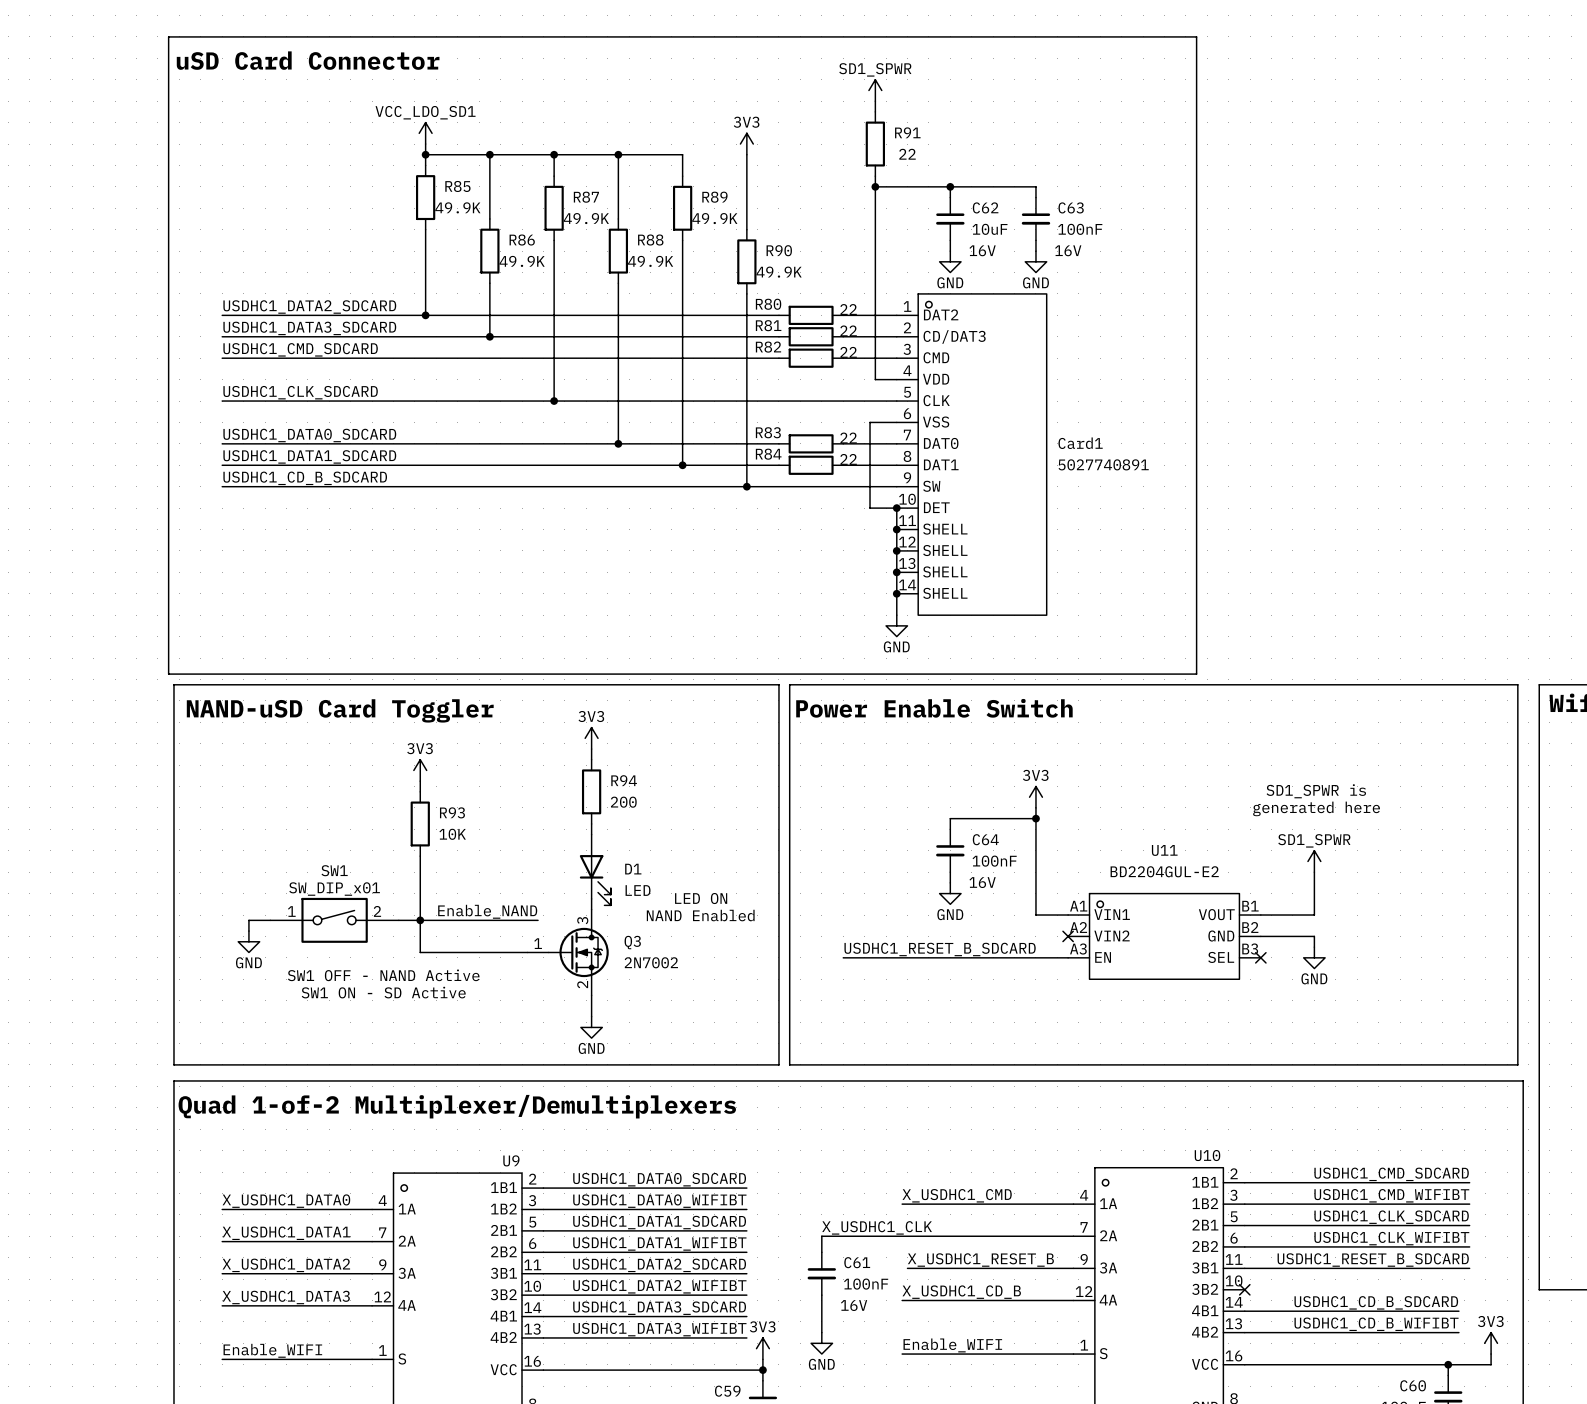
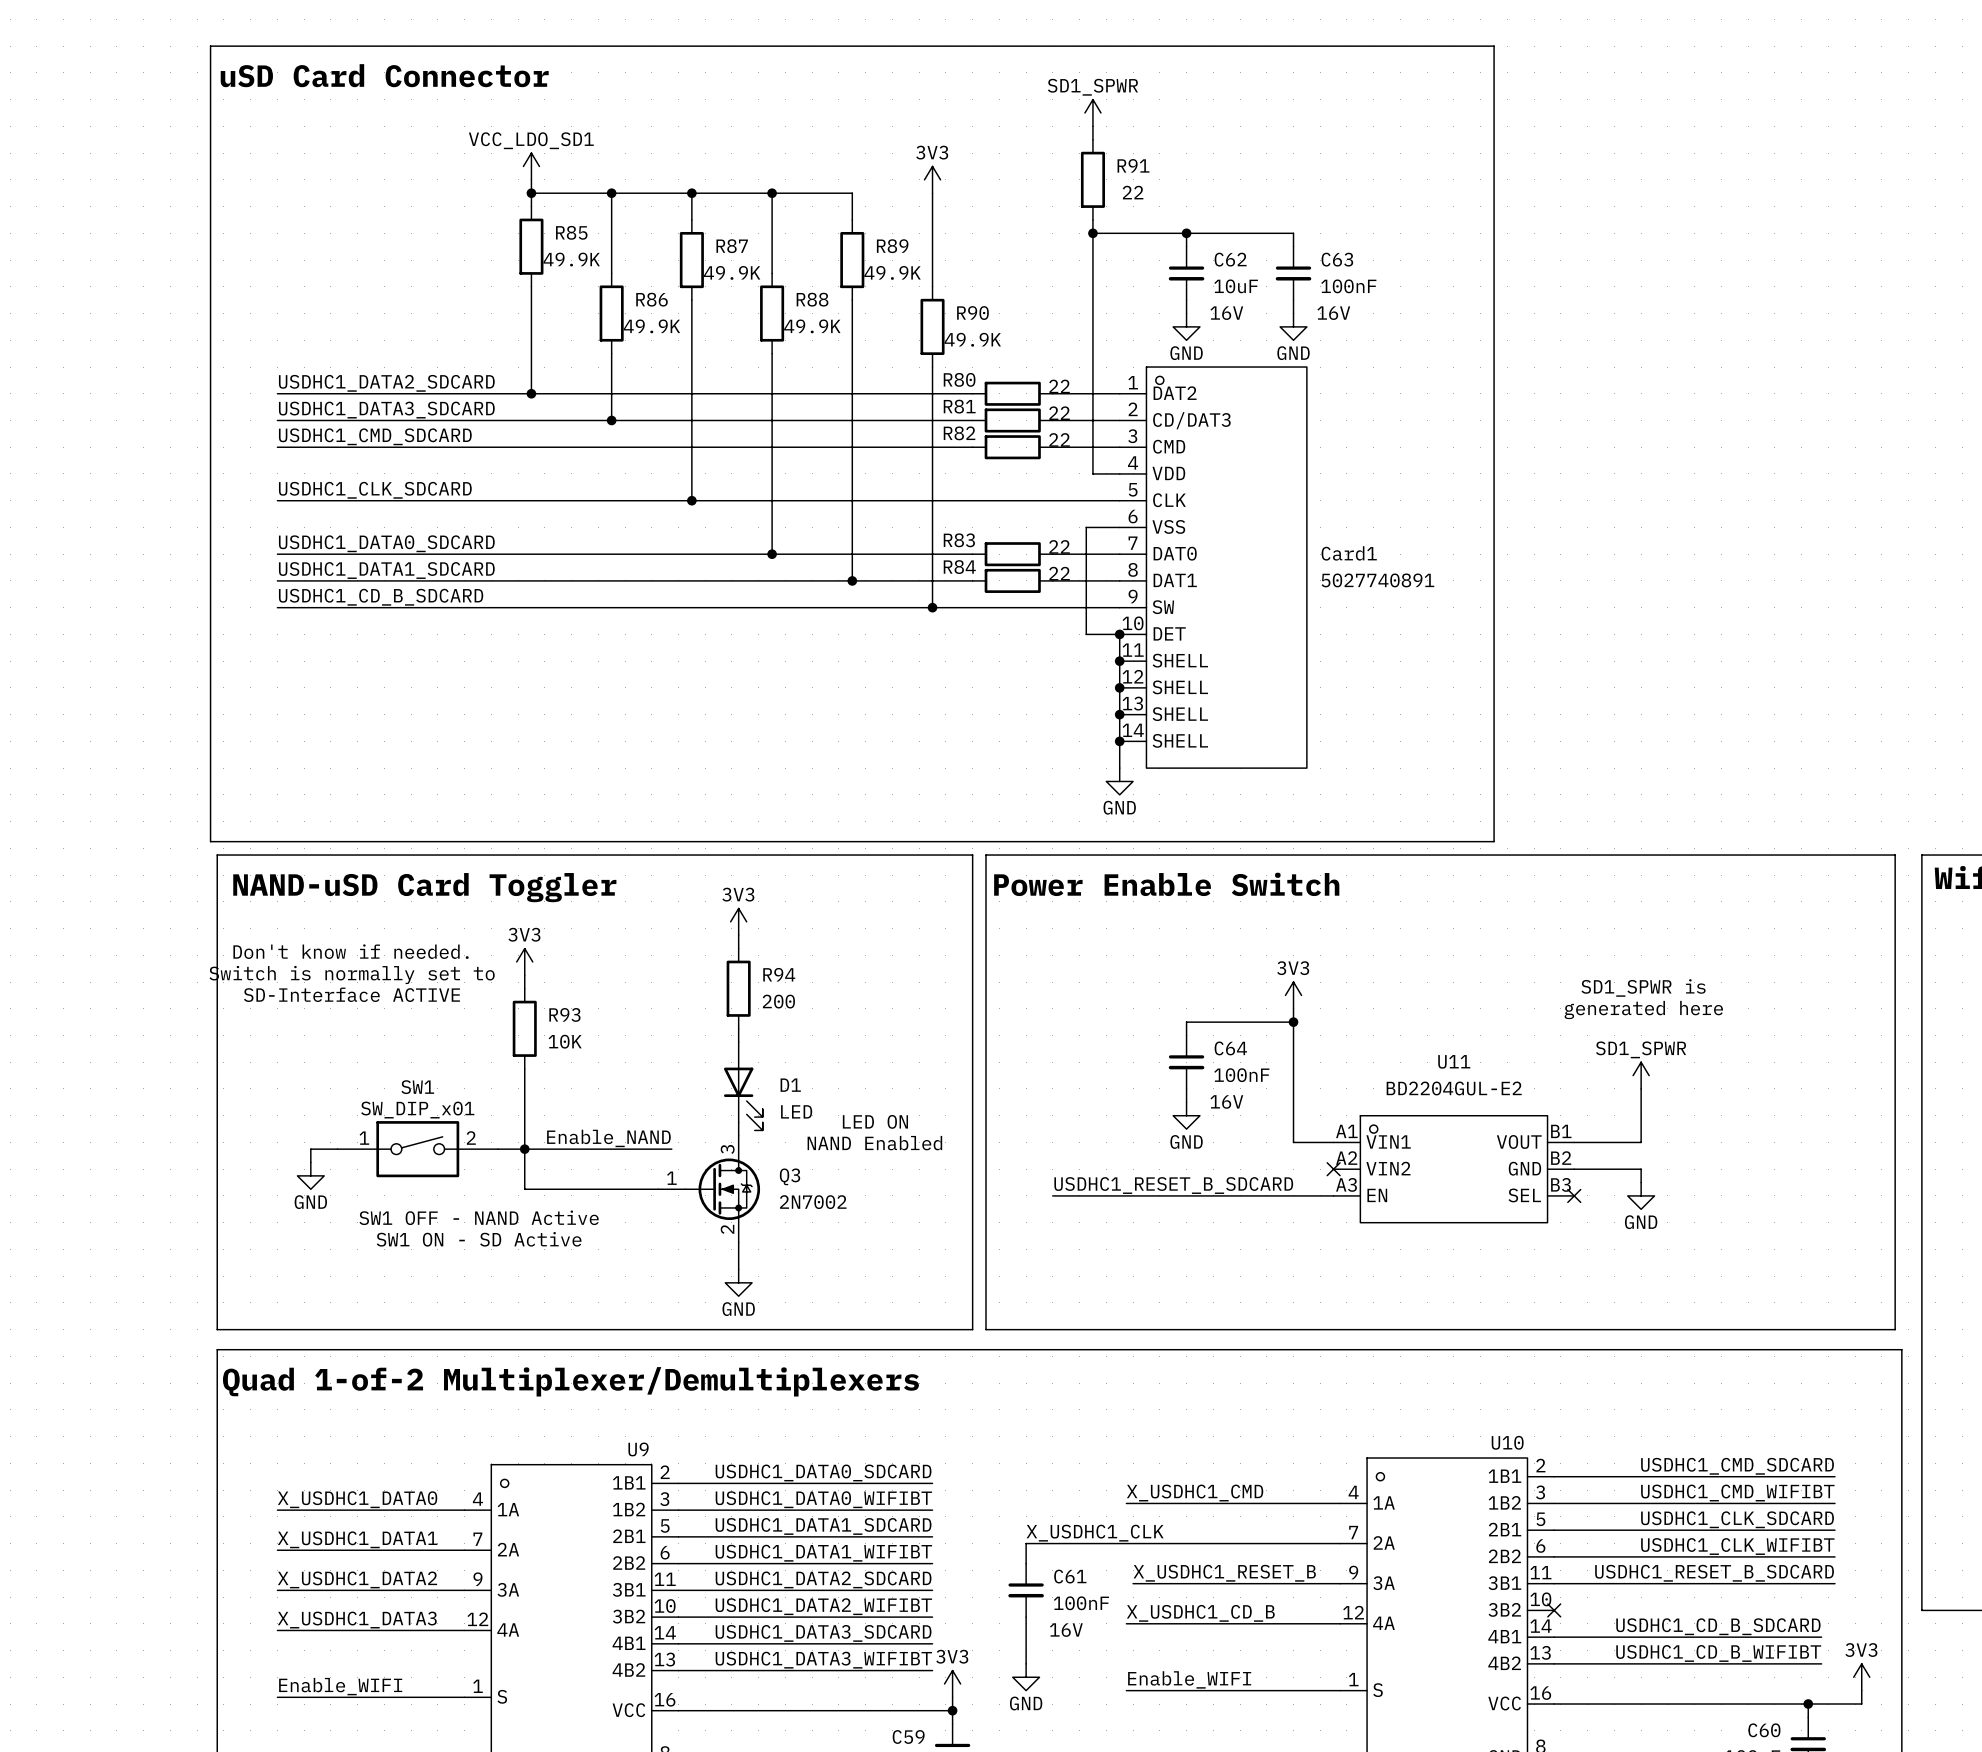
text: none -> Don't know if needed. (351, 951)
text: none -> Switch is normally set to (352, 974)
text: none -> SD-Interface ACTIVE (351, 994)

